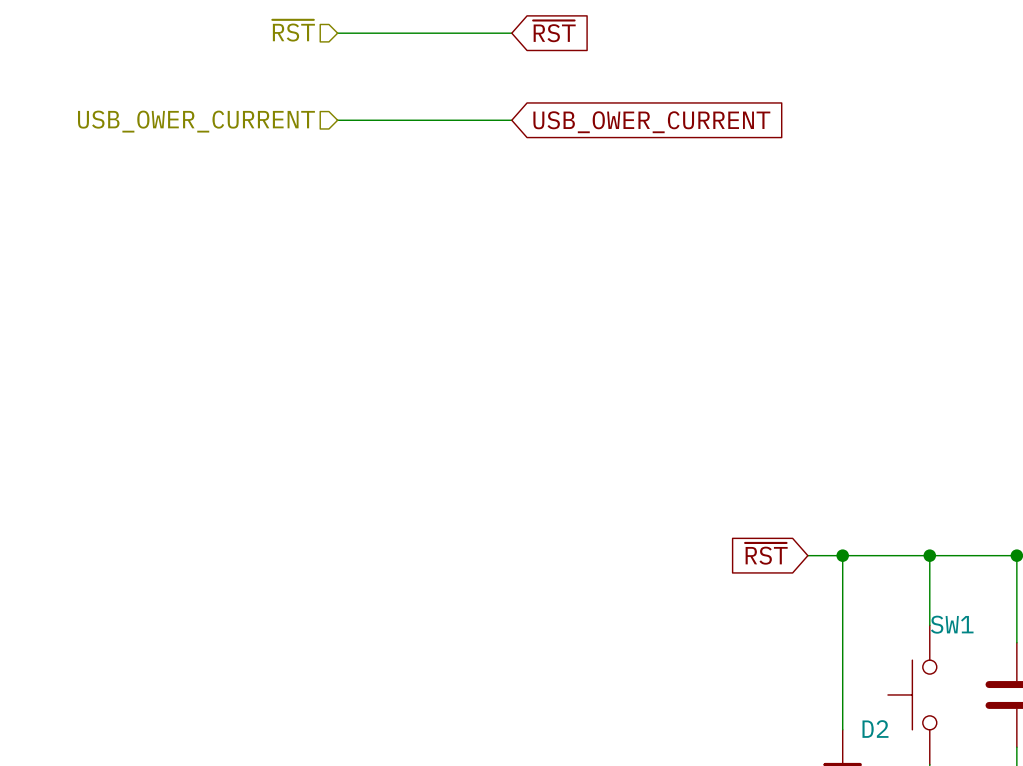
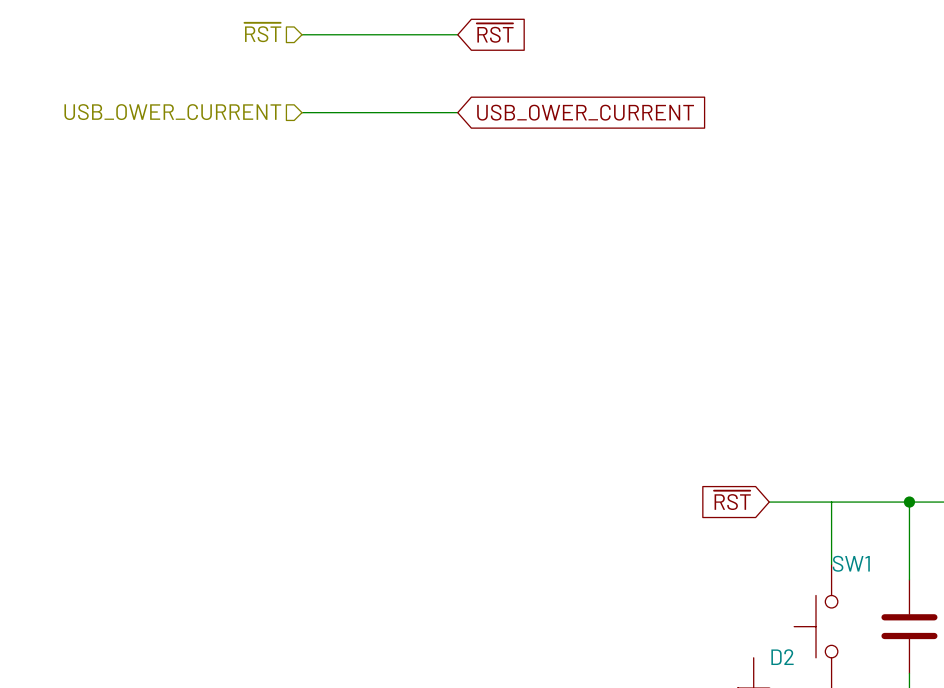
global label position: ~{RST} (766, 553) -> ~{RST} (732, 500)
wire: (807, 555) (860, 555) -> none
wire: (842, 555) (842, 729) -> none
junction: (842, 555) -> none
junction: (929, 555) -> none

